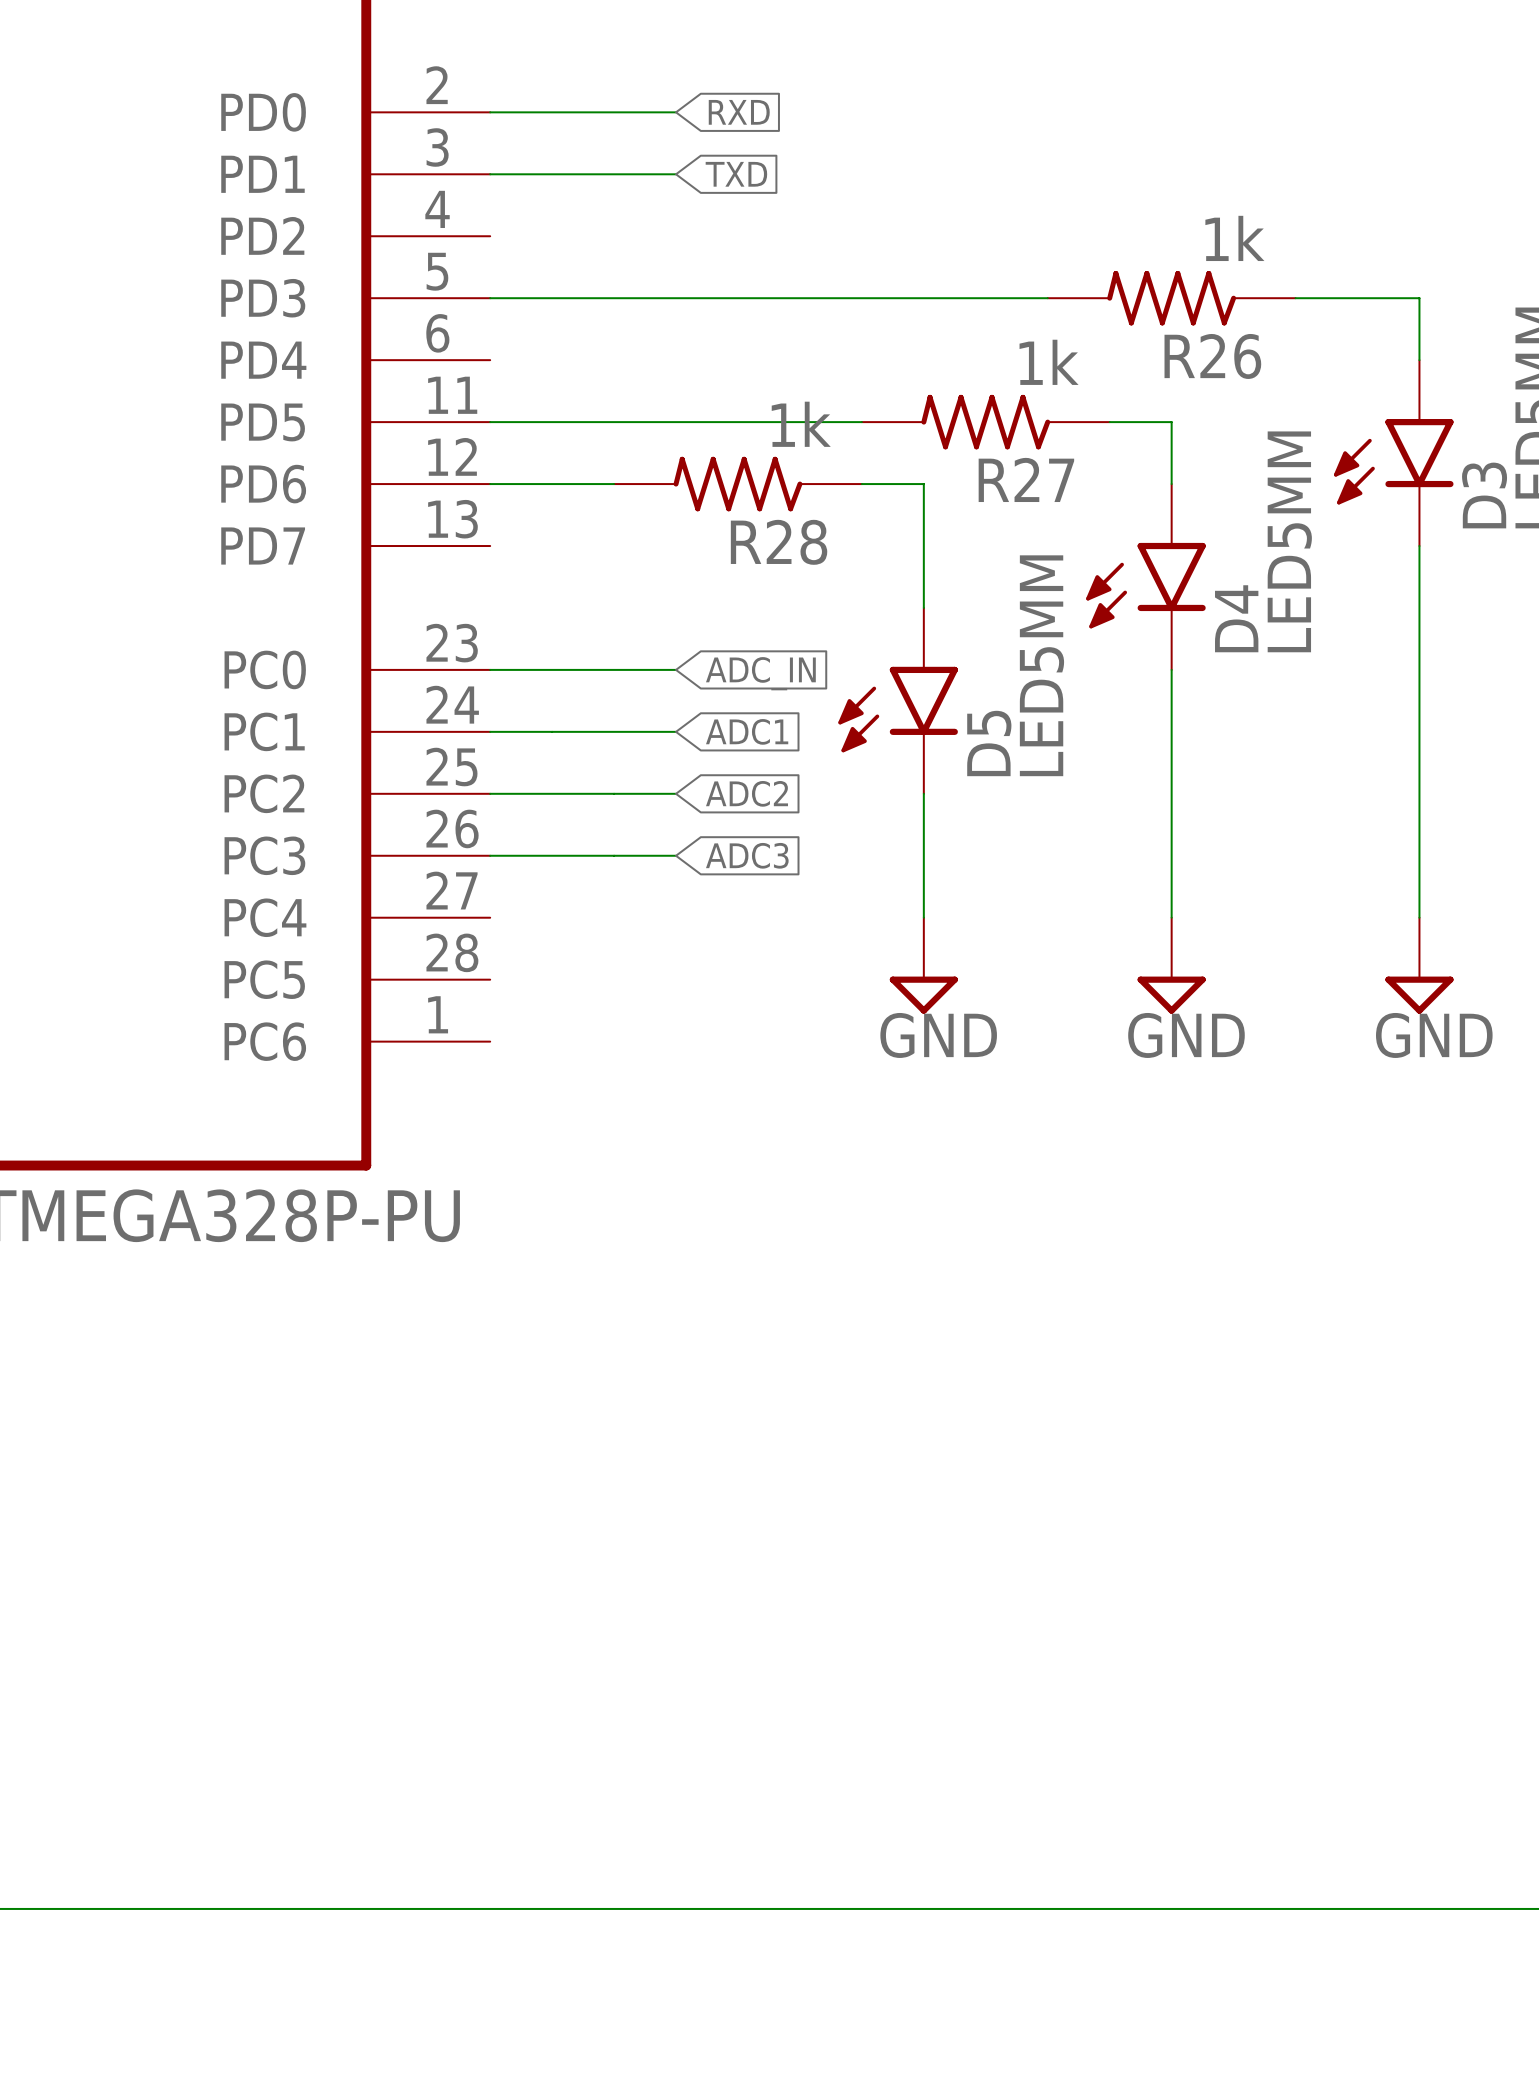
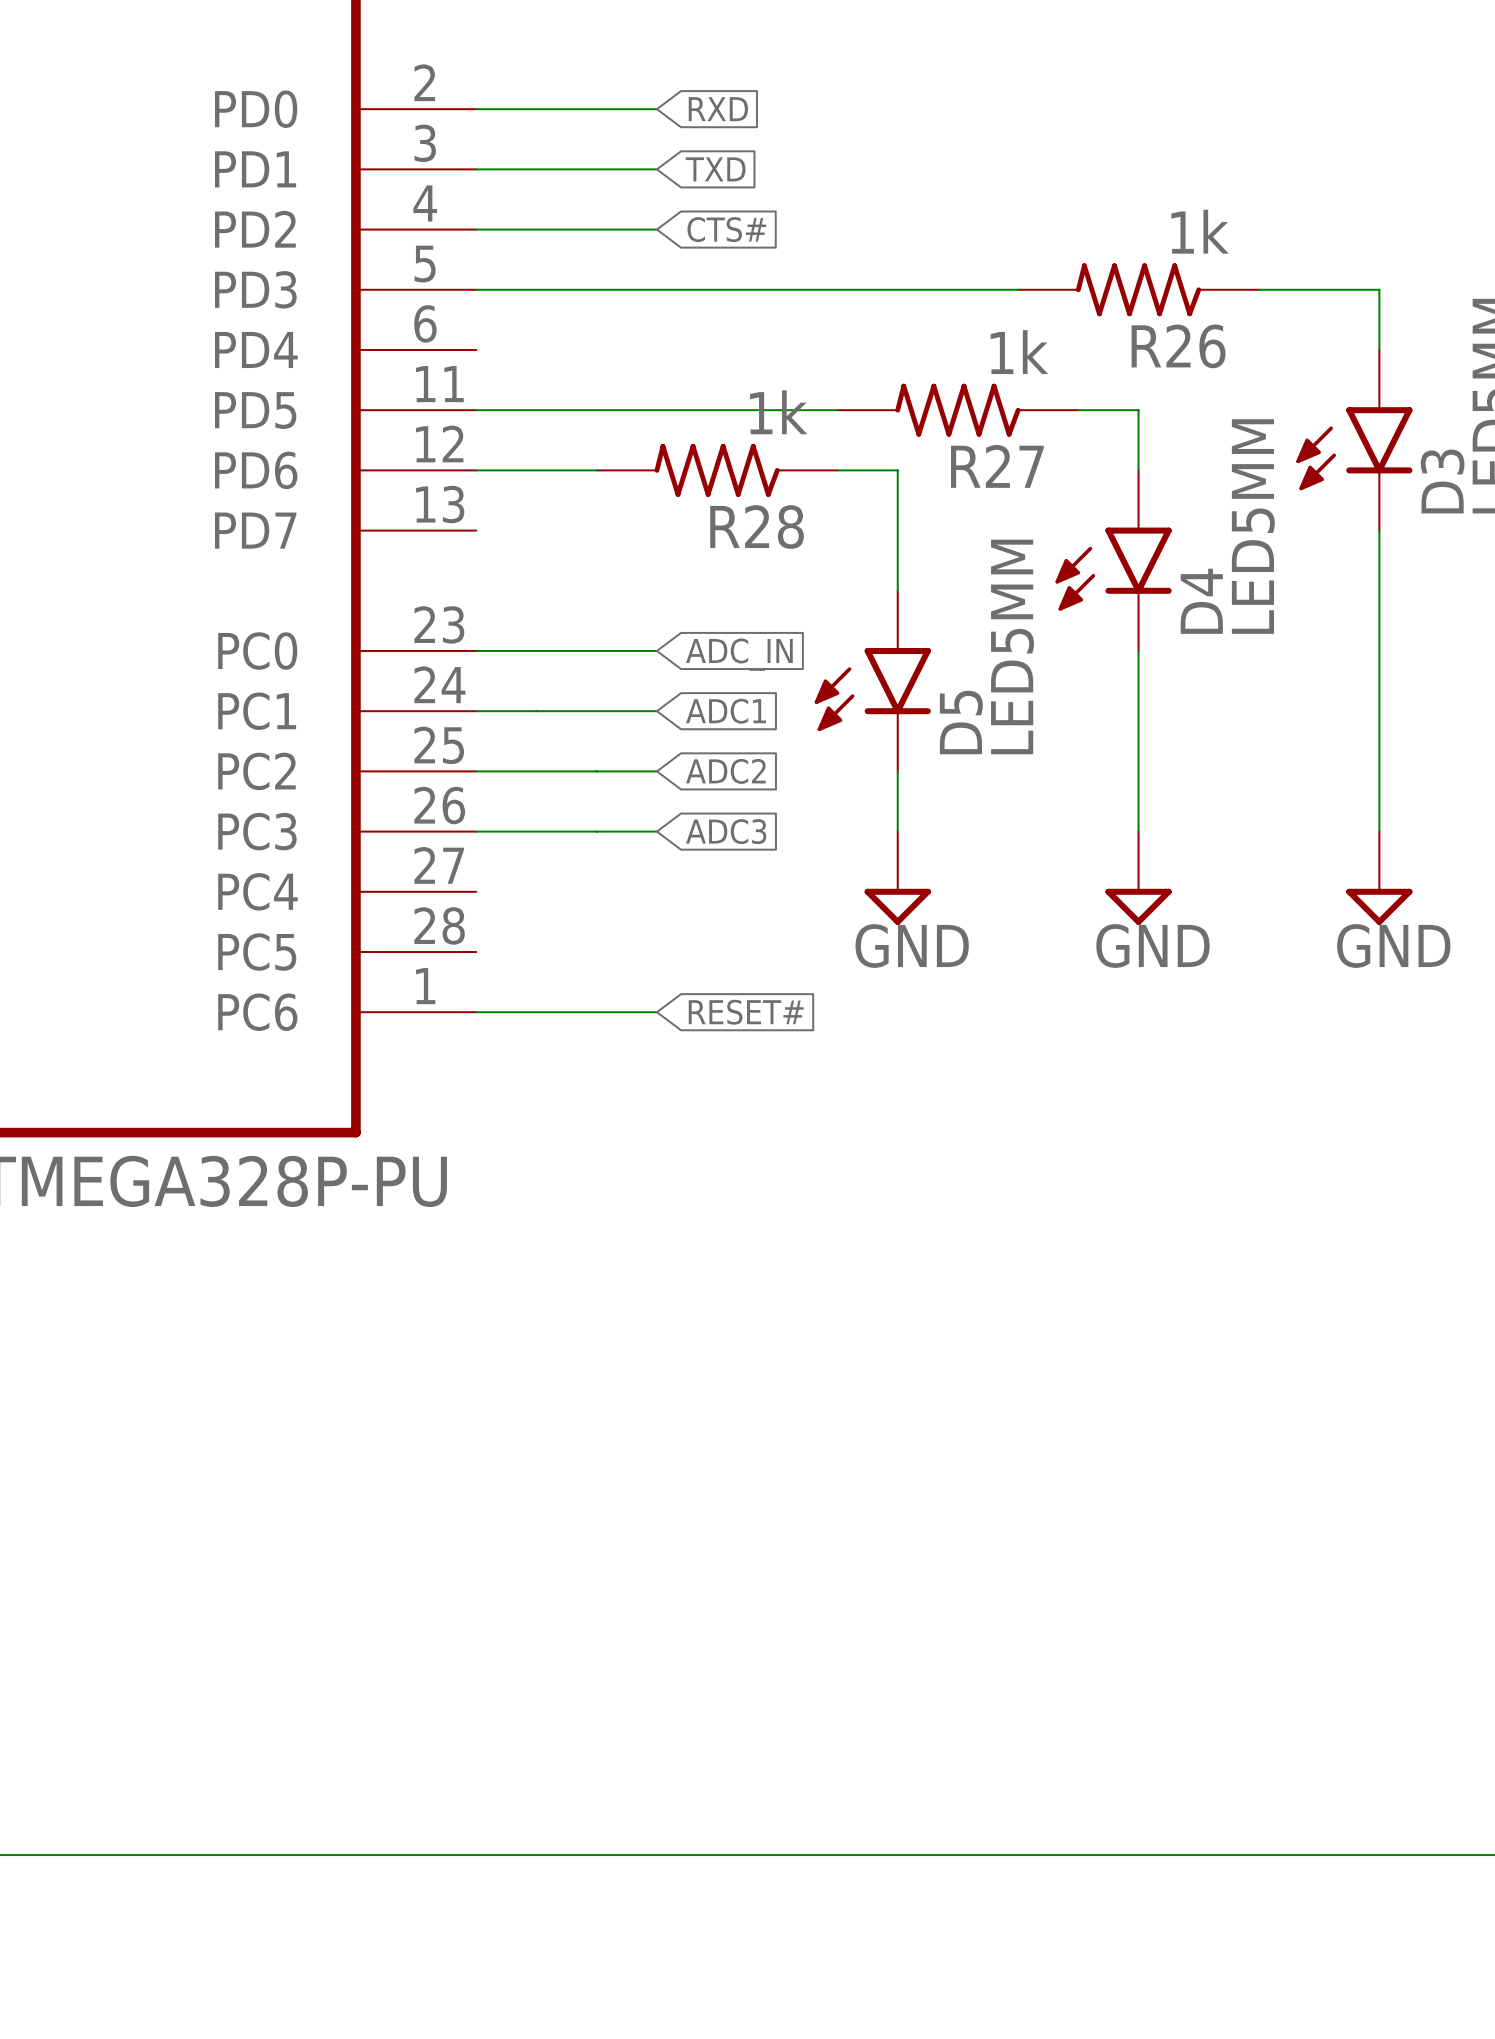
wire: none -> (476, 229) (656, 229)
global label: none -> CTS# (726, 229)
power symbol position: GND (923, 965) -> GND (897, 878)
power symbol position: GND (1171, 965) -> GND (1138, 878)
power symbol position: GND (1419, 965) -> GND (1379, 878)
wire: none -> (476, 1012) (656, 1012)
global label: none -> RESET# (746, 1012)

